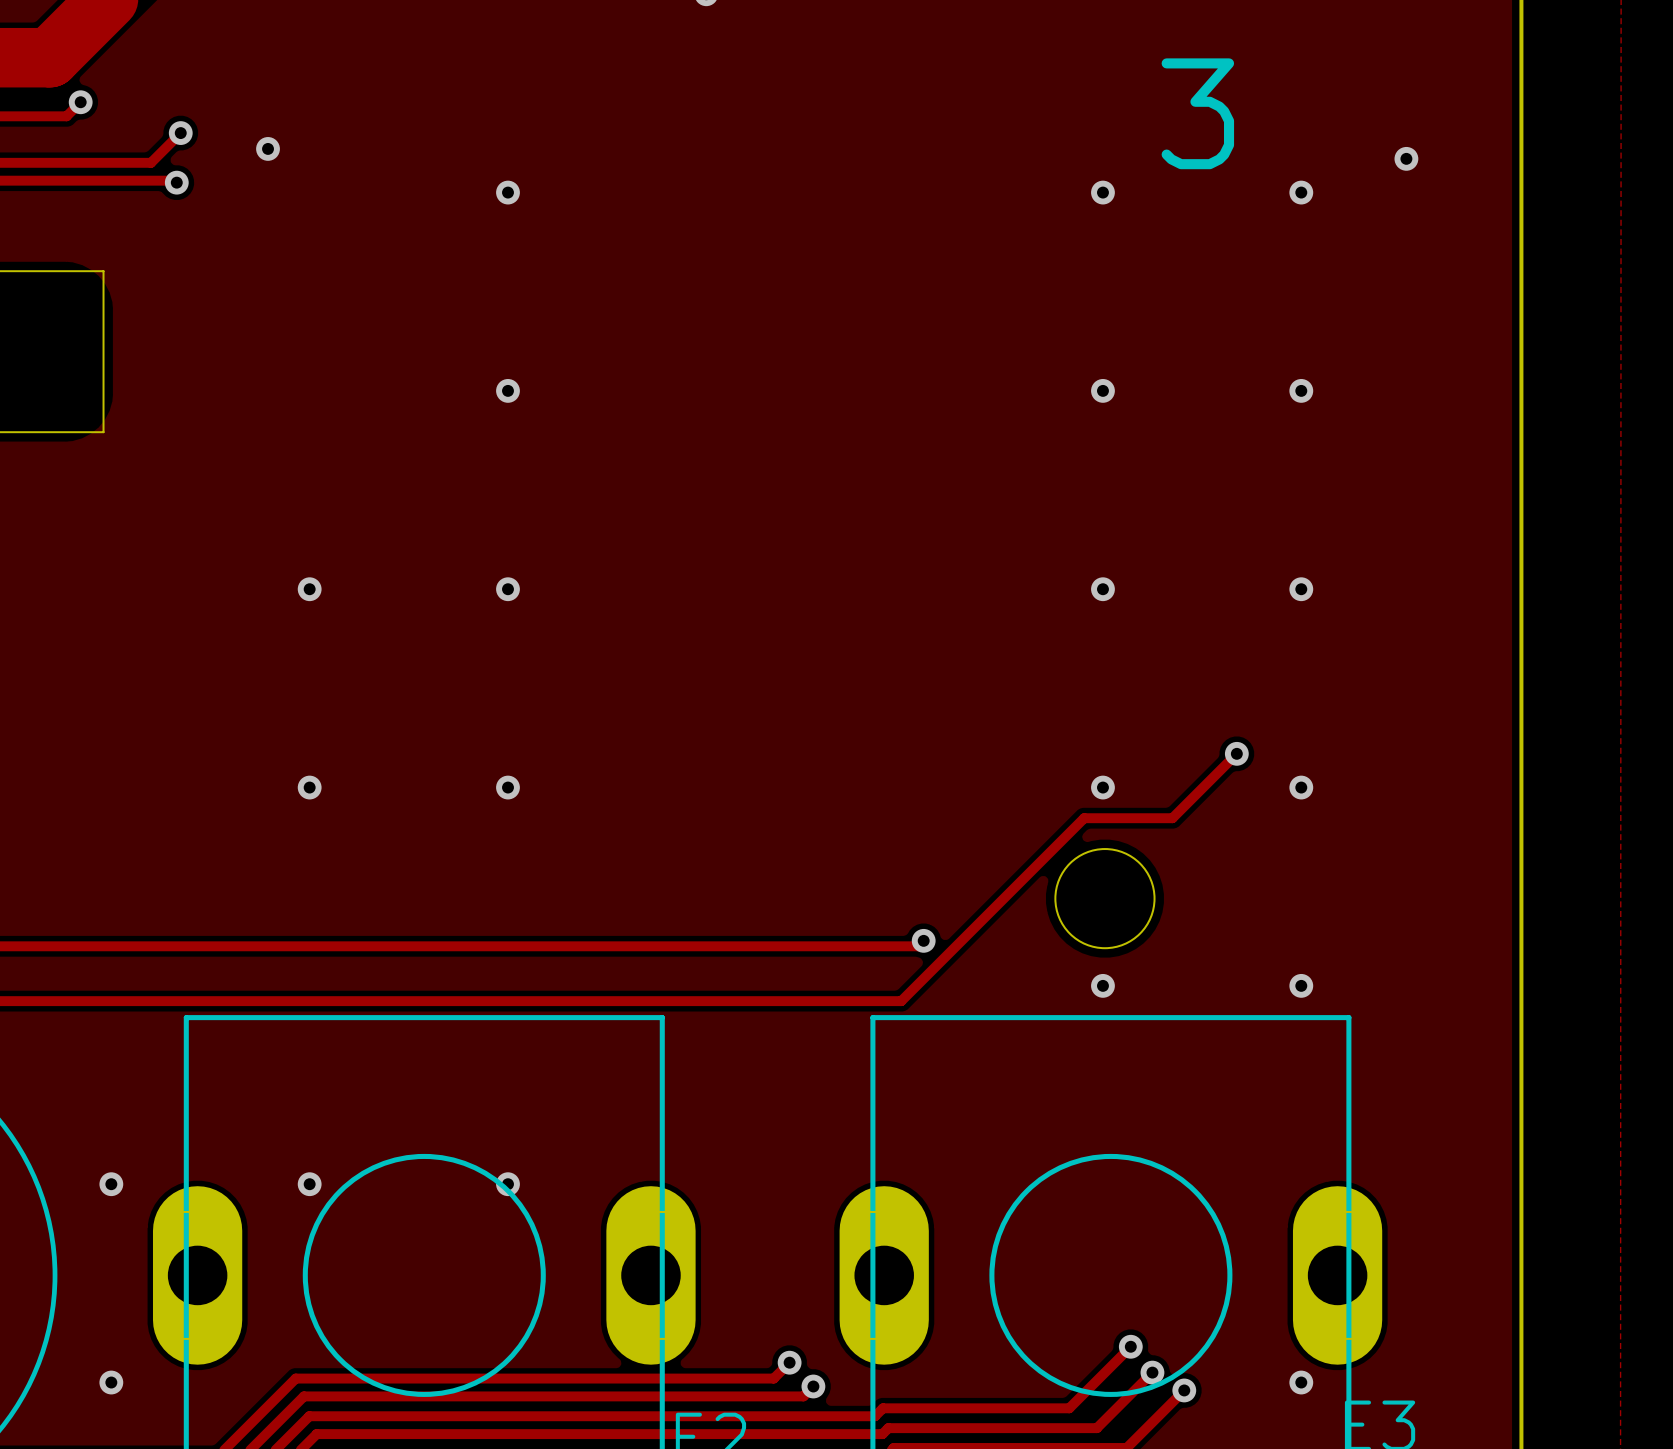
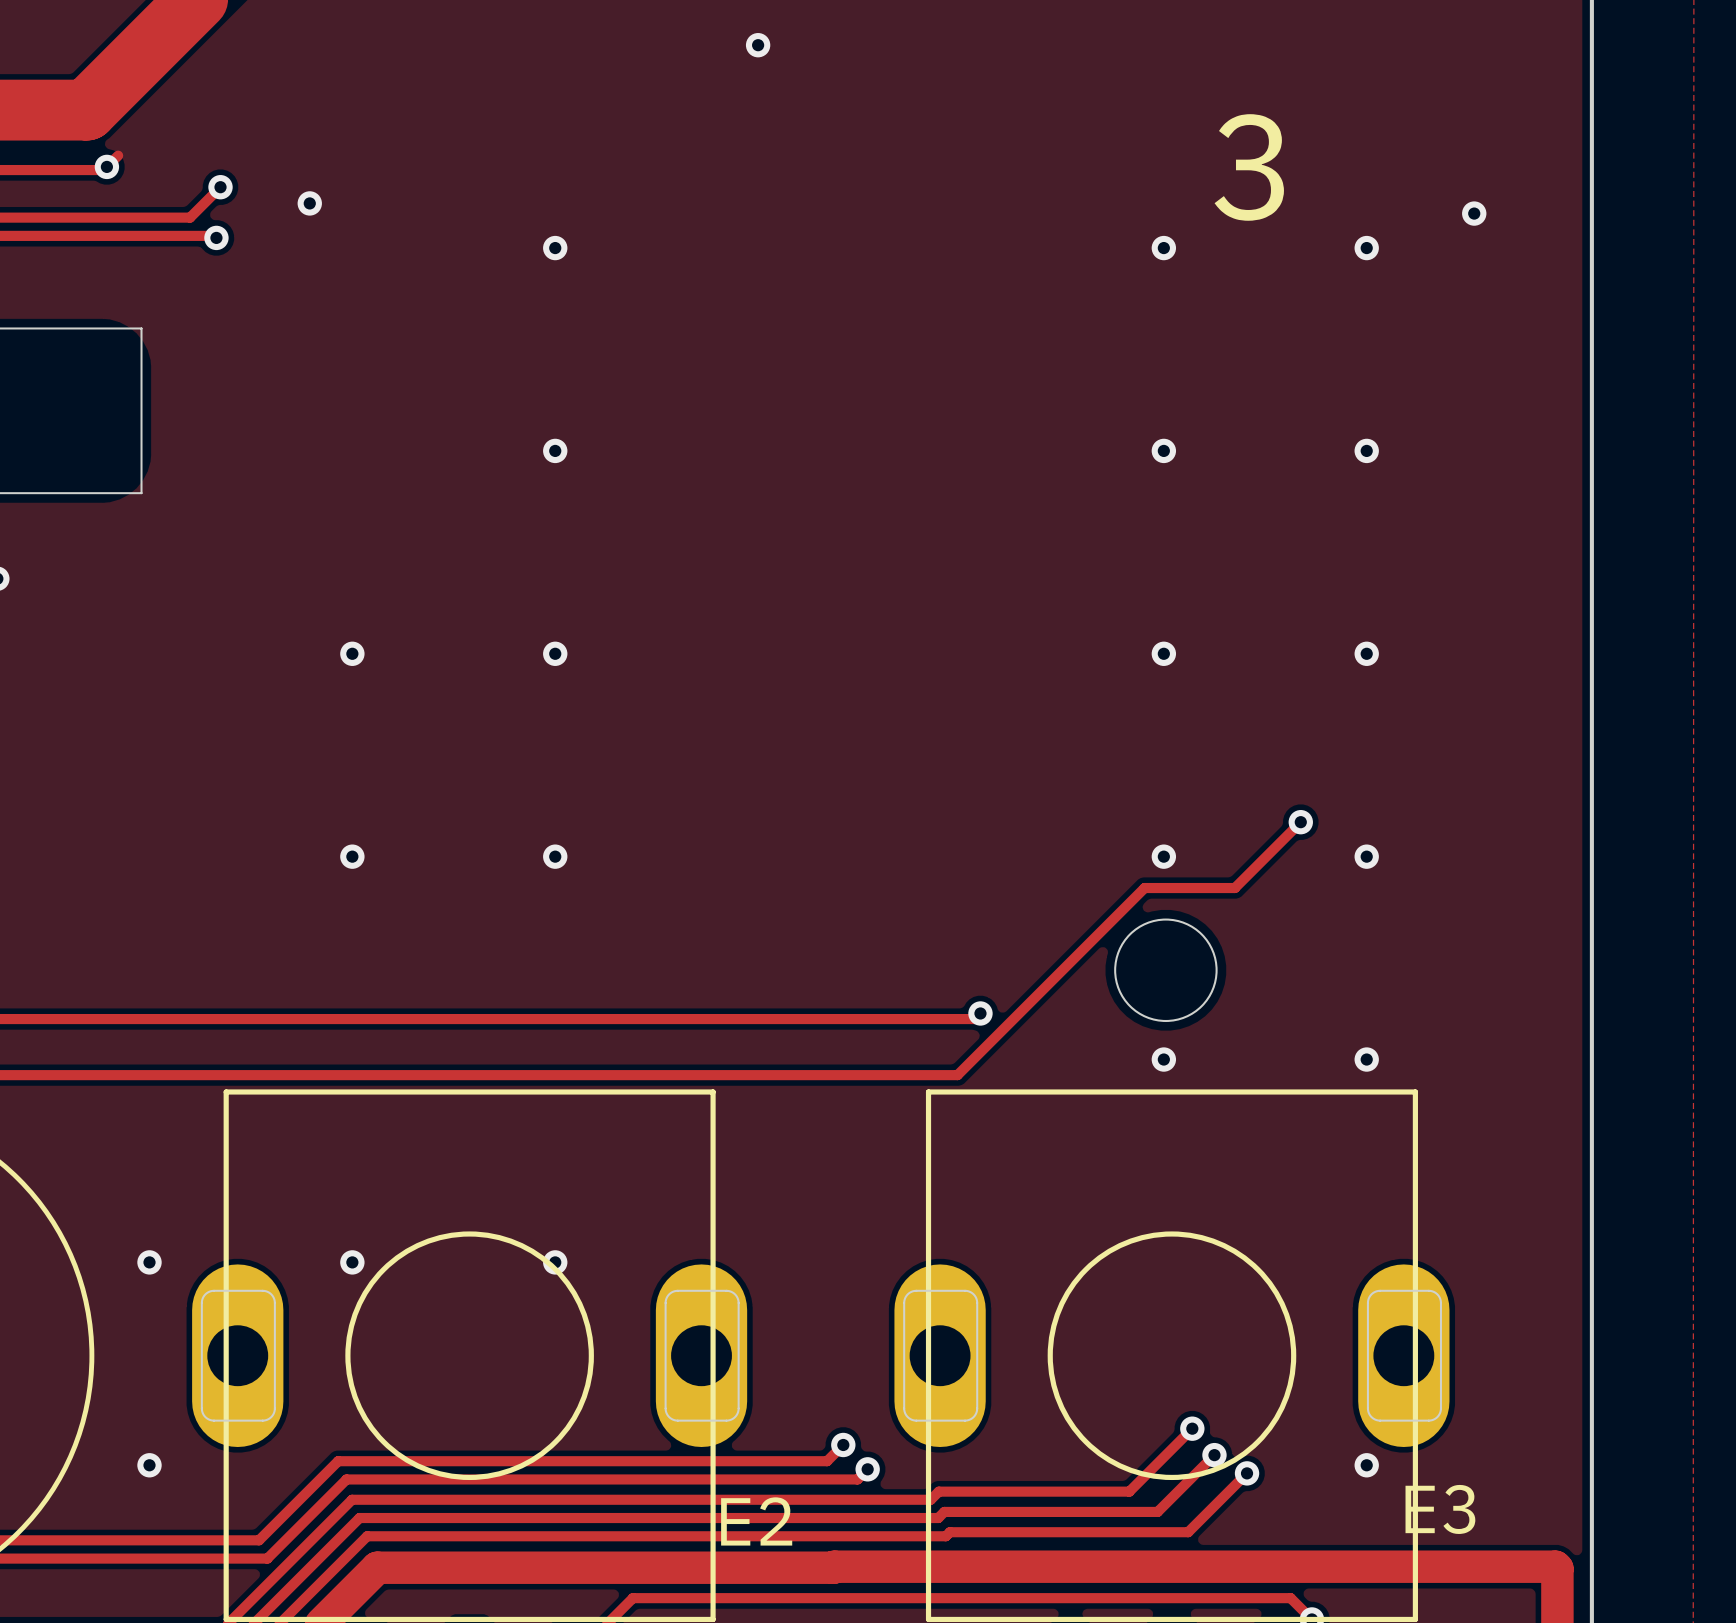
via position: (80, 102) -> (106, 166)

